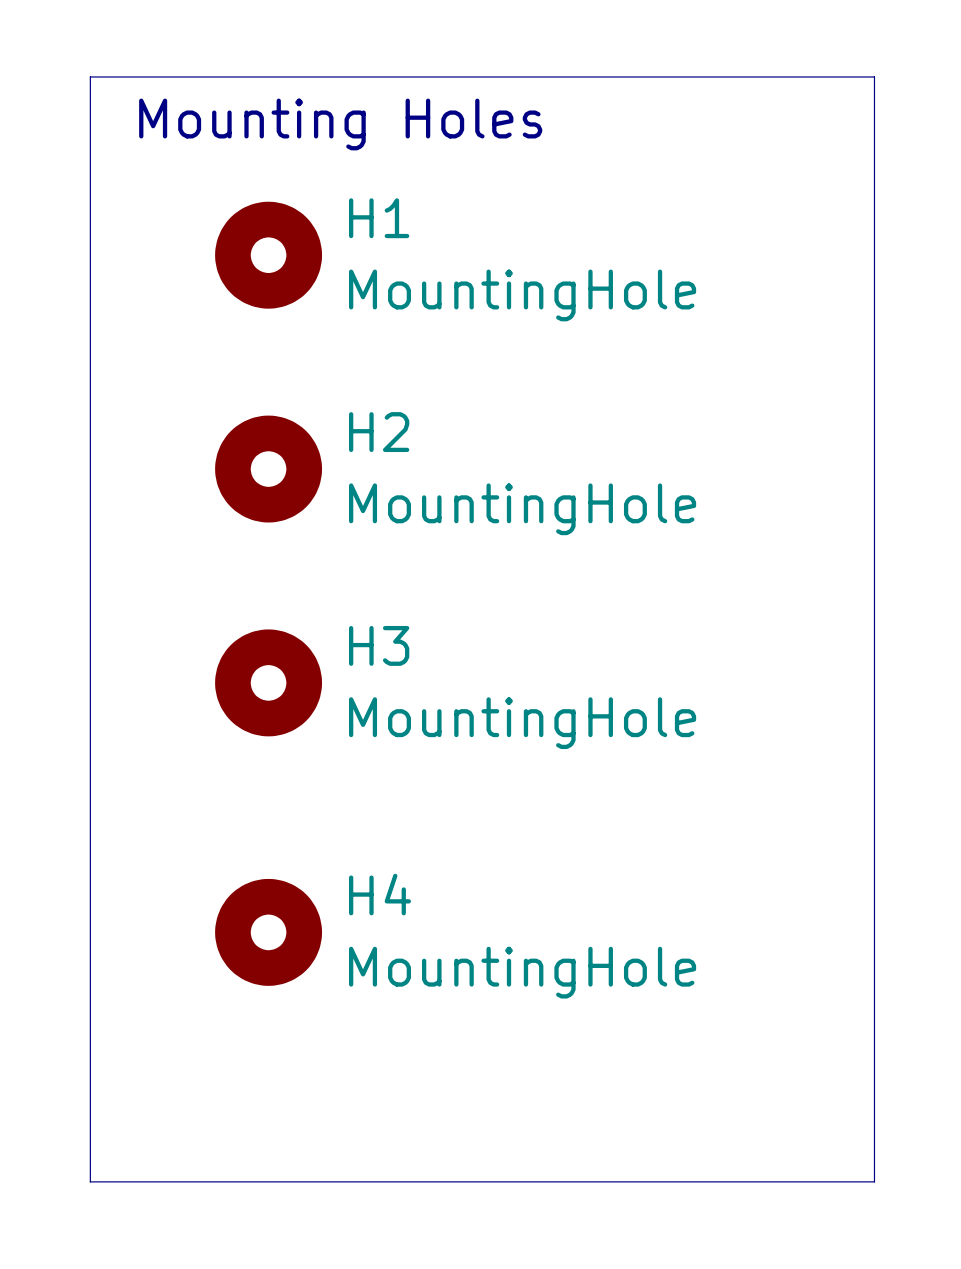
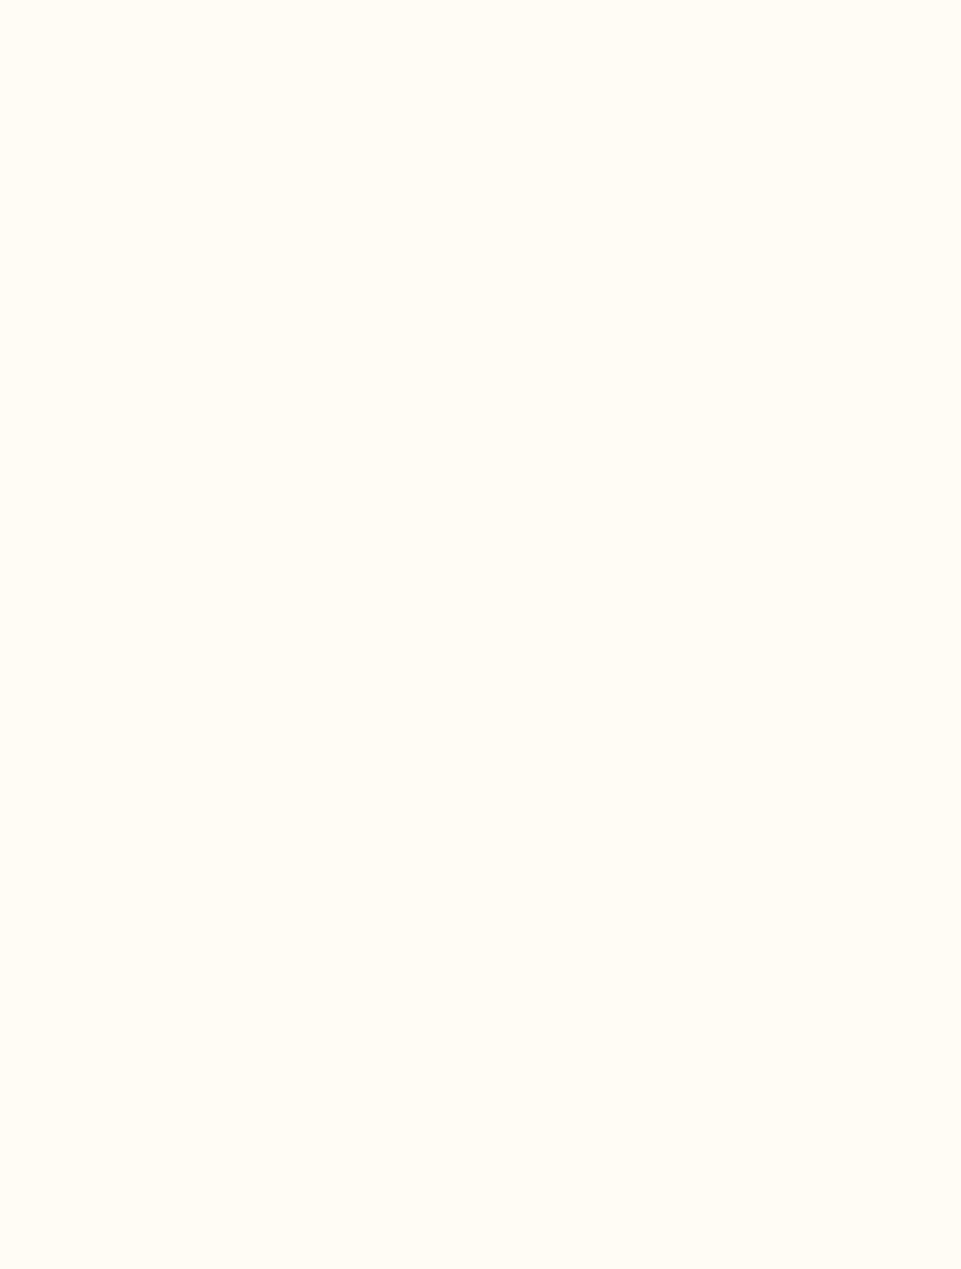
line: (90, 76) (874, 76) (874, 1181) (90, 1181) (90, 76) -> none
text: Mounting Holes (340, 124) -> none
H1: MountingHole (268, 255) -> none
H2: MountingHole (268, 469) -> none
H3: MountingHole (268, 682) -> none
H4: MountingHole (268, 932) -> none

